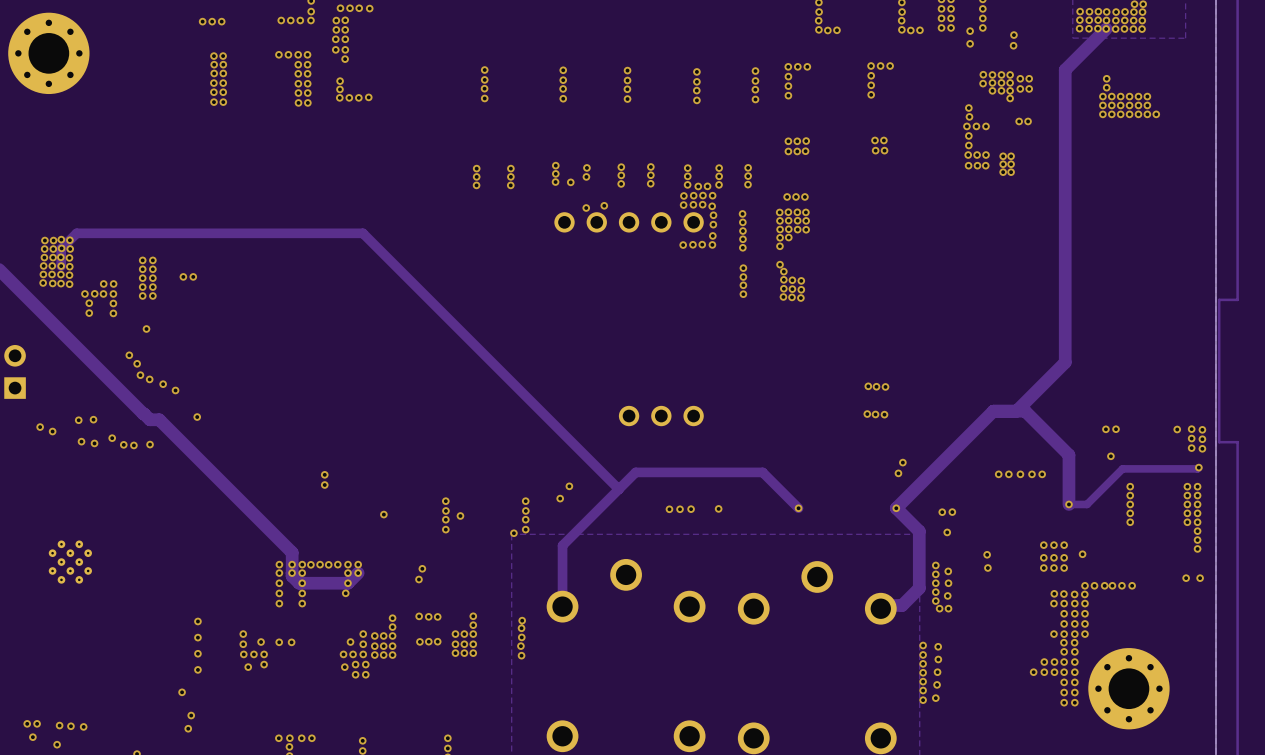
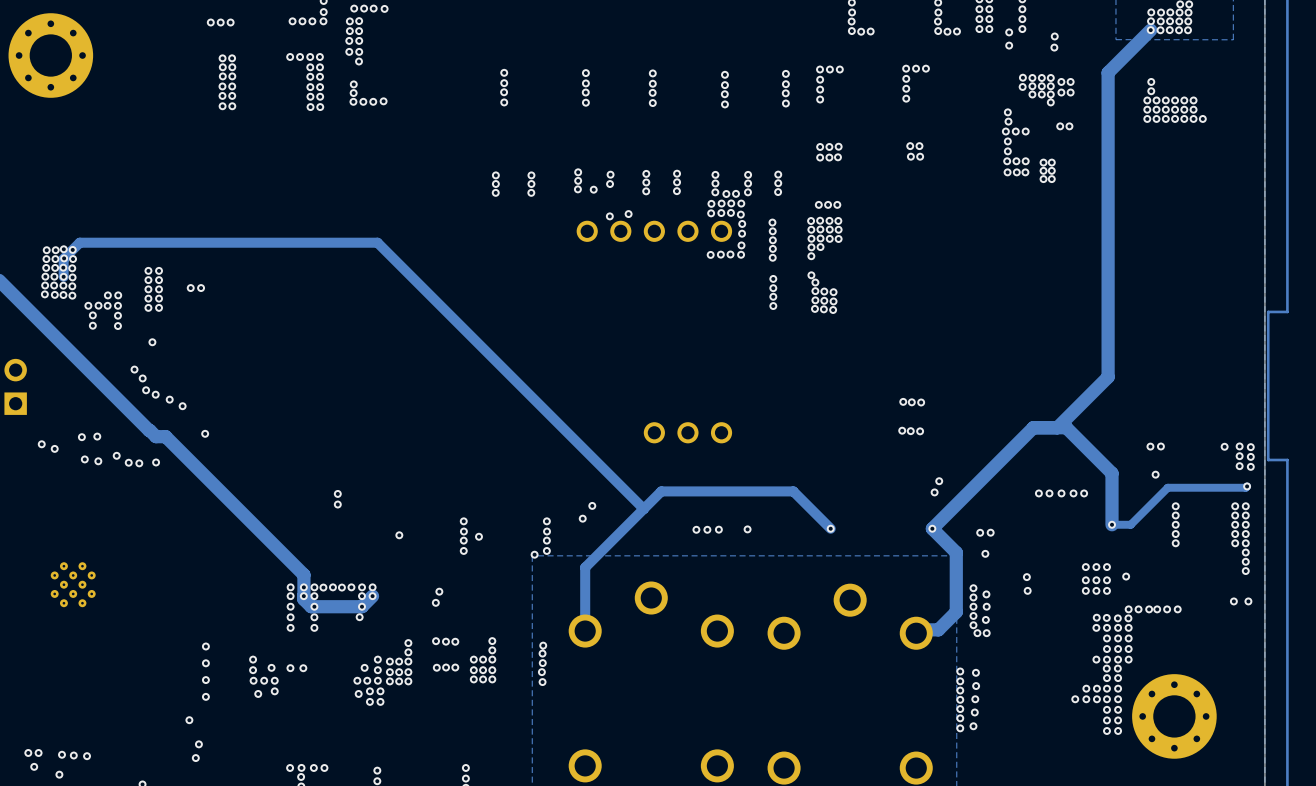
via: (1080, 11) -> none
via: (1089, 11) -> none
via: (1098, 11) -> none
via: (1079, 20) -> none
via: (1089, 20) -> none
via: (1098, 20) -> none
via: (1079, 28) -> none
via: (1089, 28) -> none
via: (1097, 28) -> none

